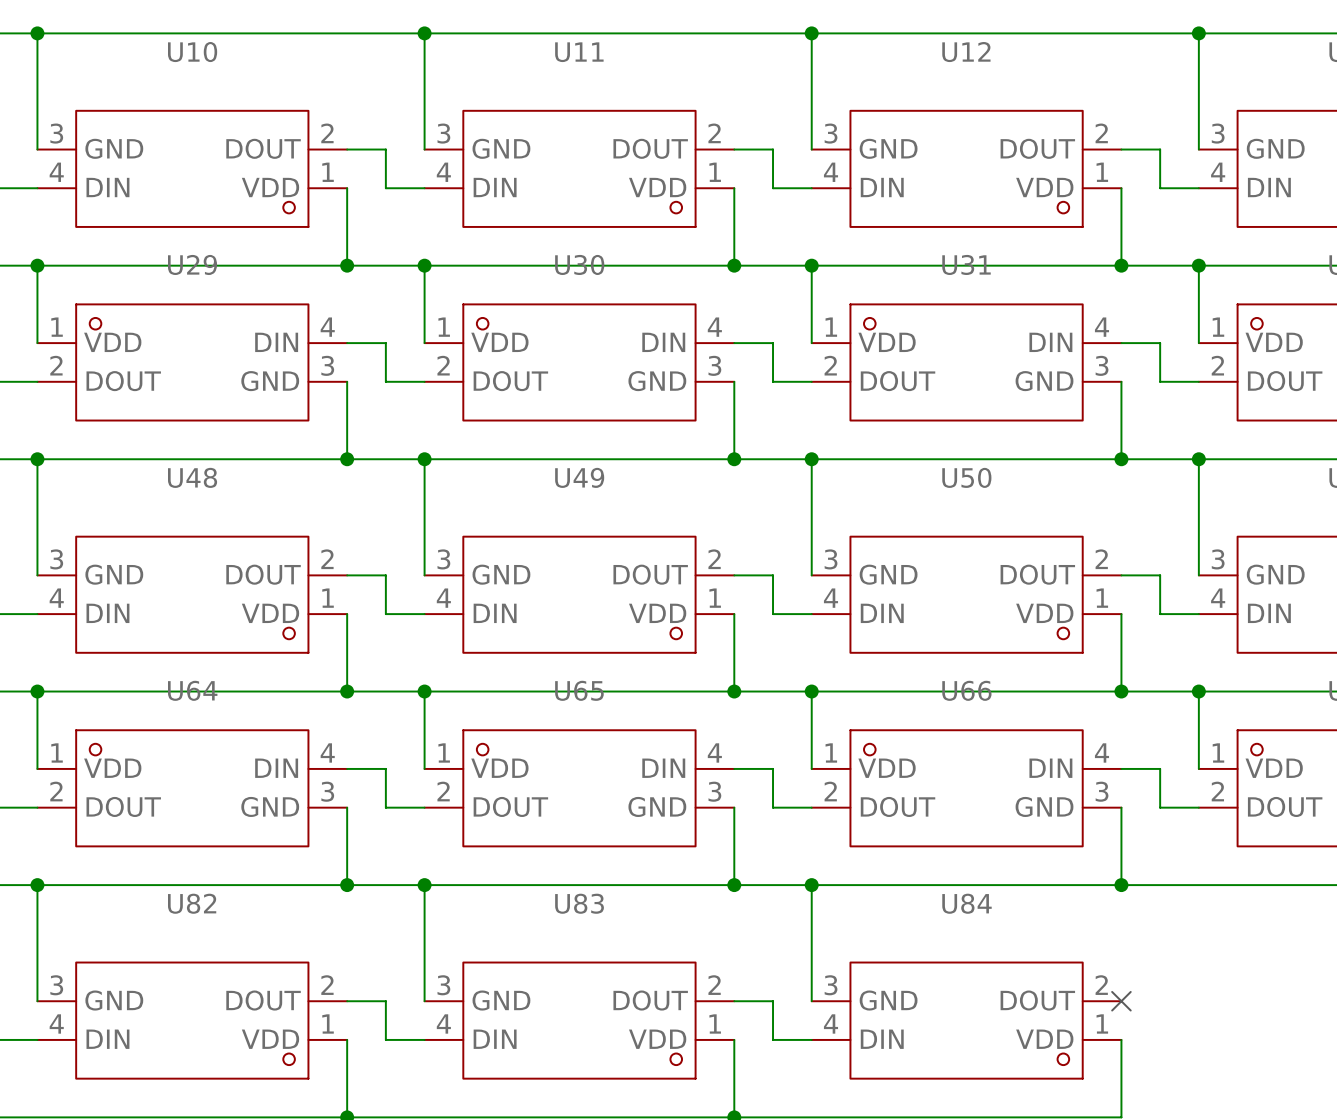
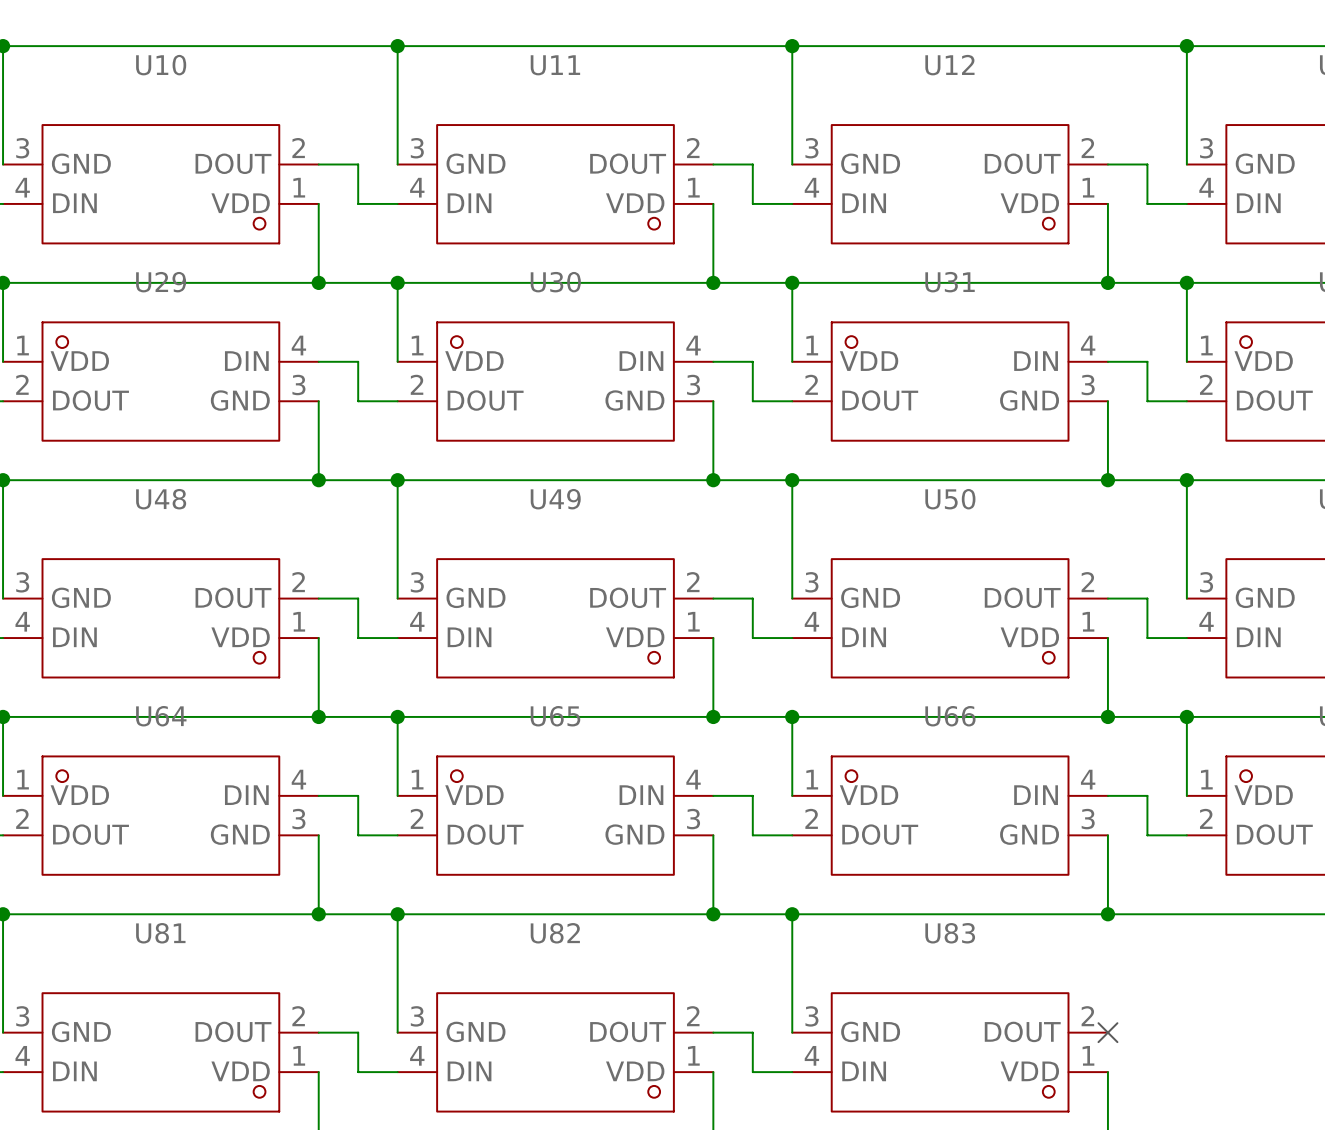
U82 name: U82 (192, 903) -> U81 (160, 933)
U83 name: U83 (579, 903) -> U82 (555, 933)
U84 name: U84 (966, 903) -> U83 (950, 933)

